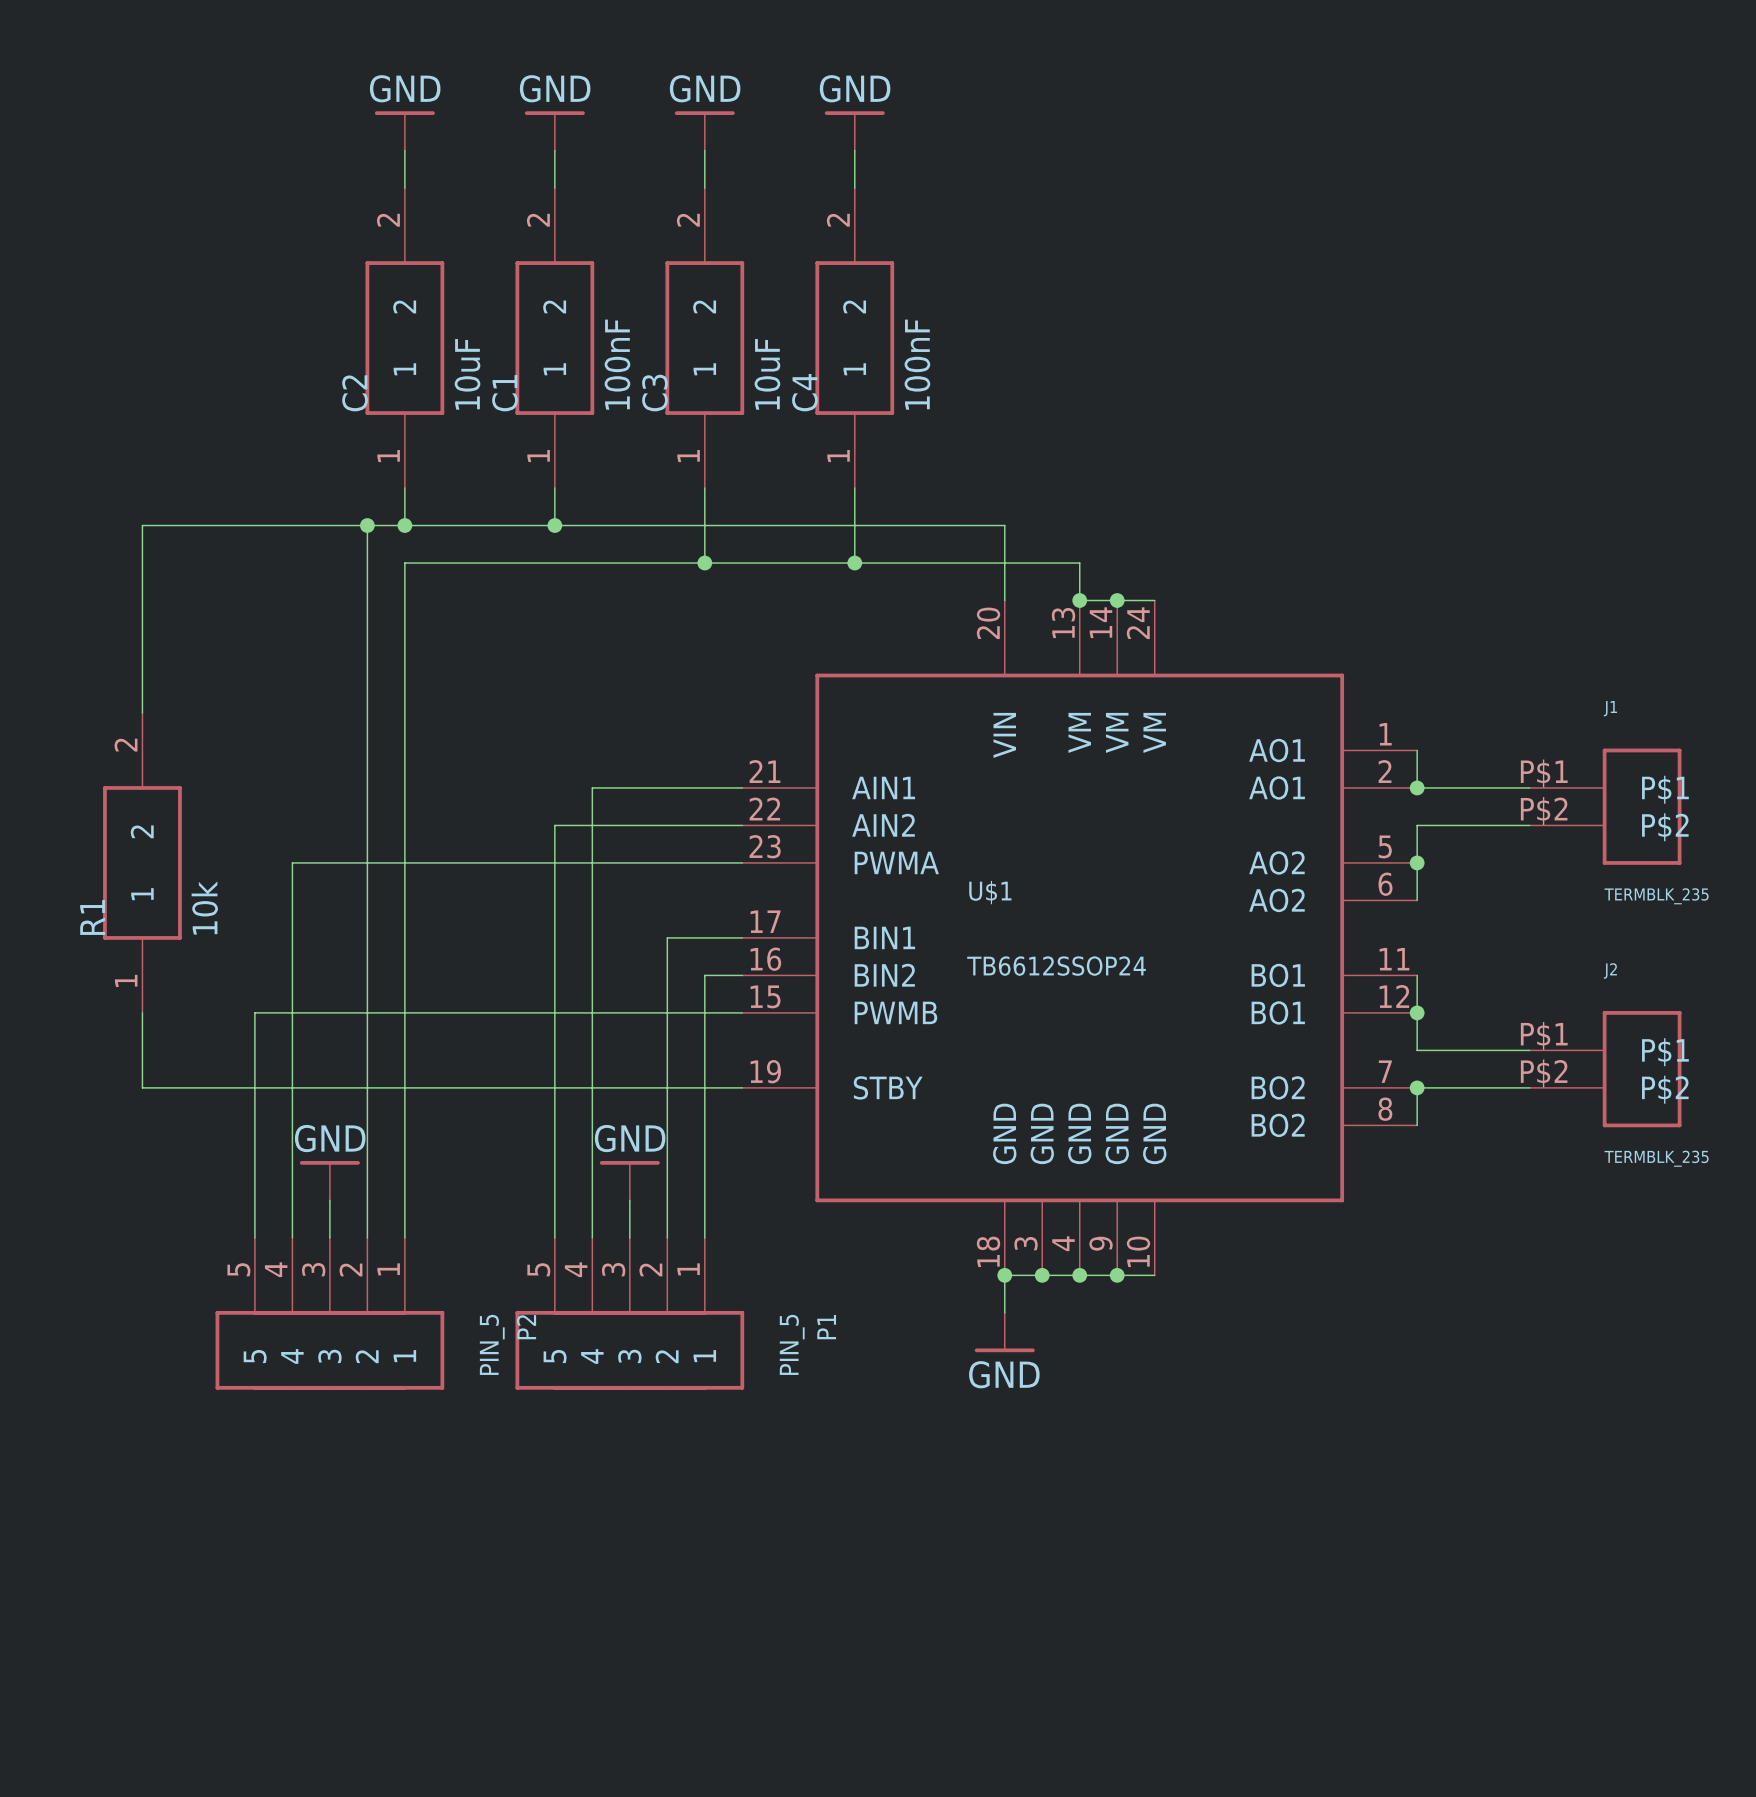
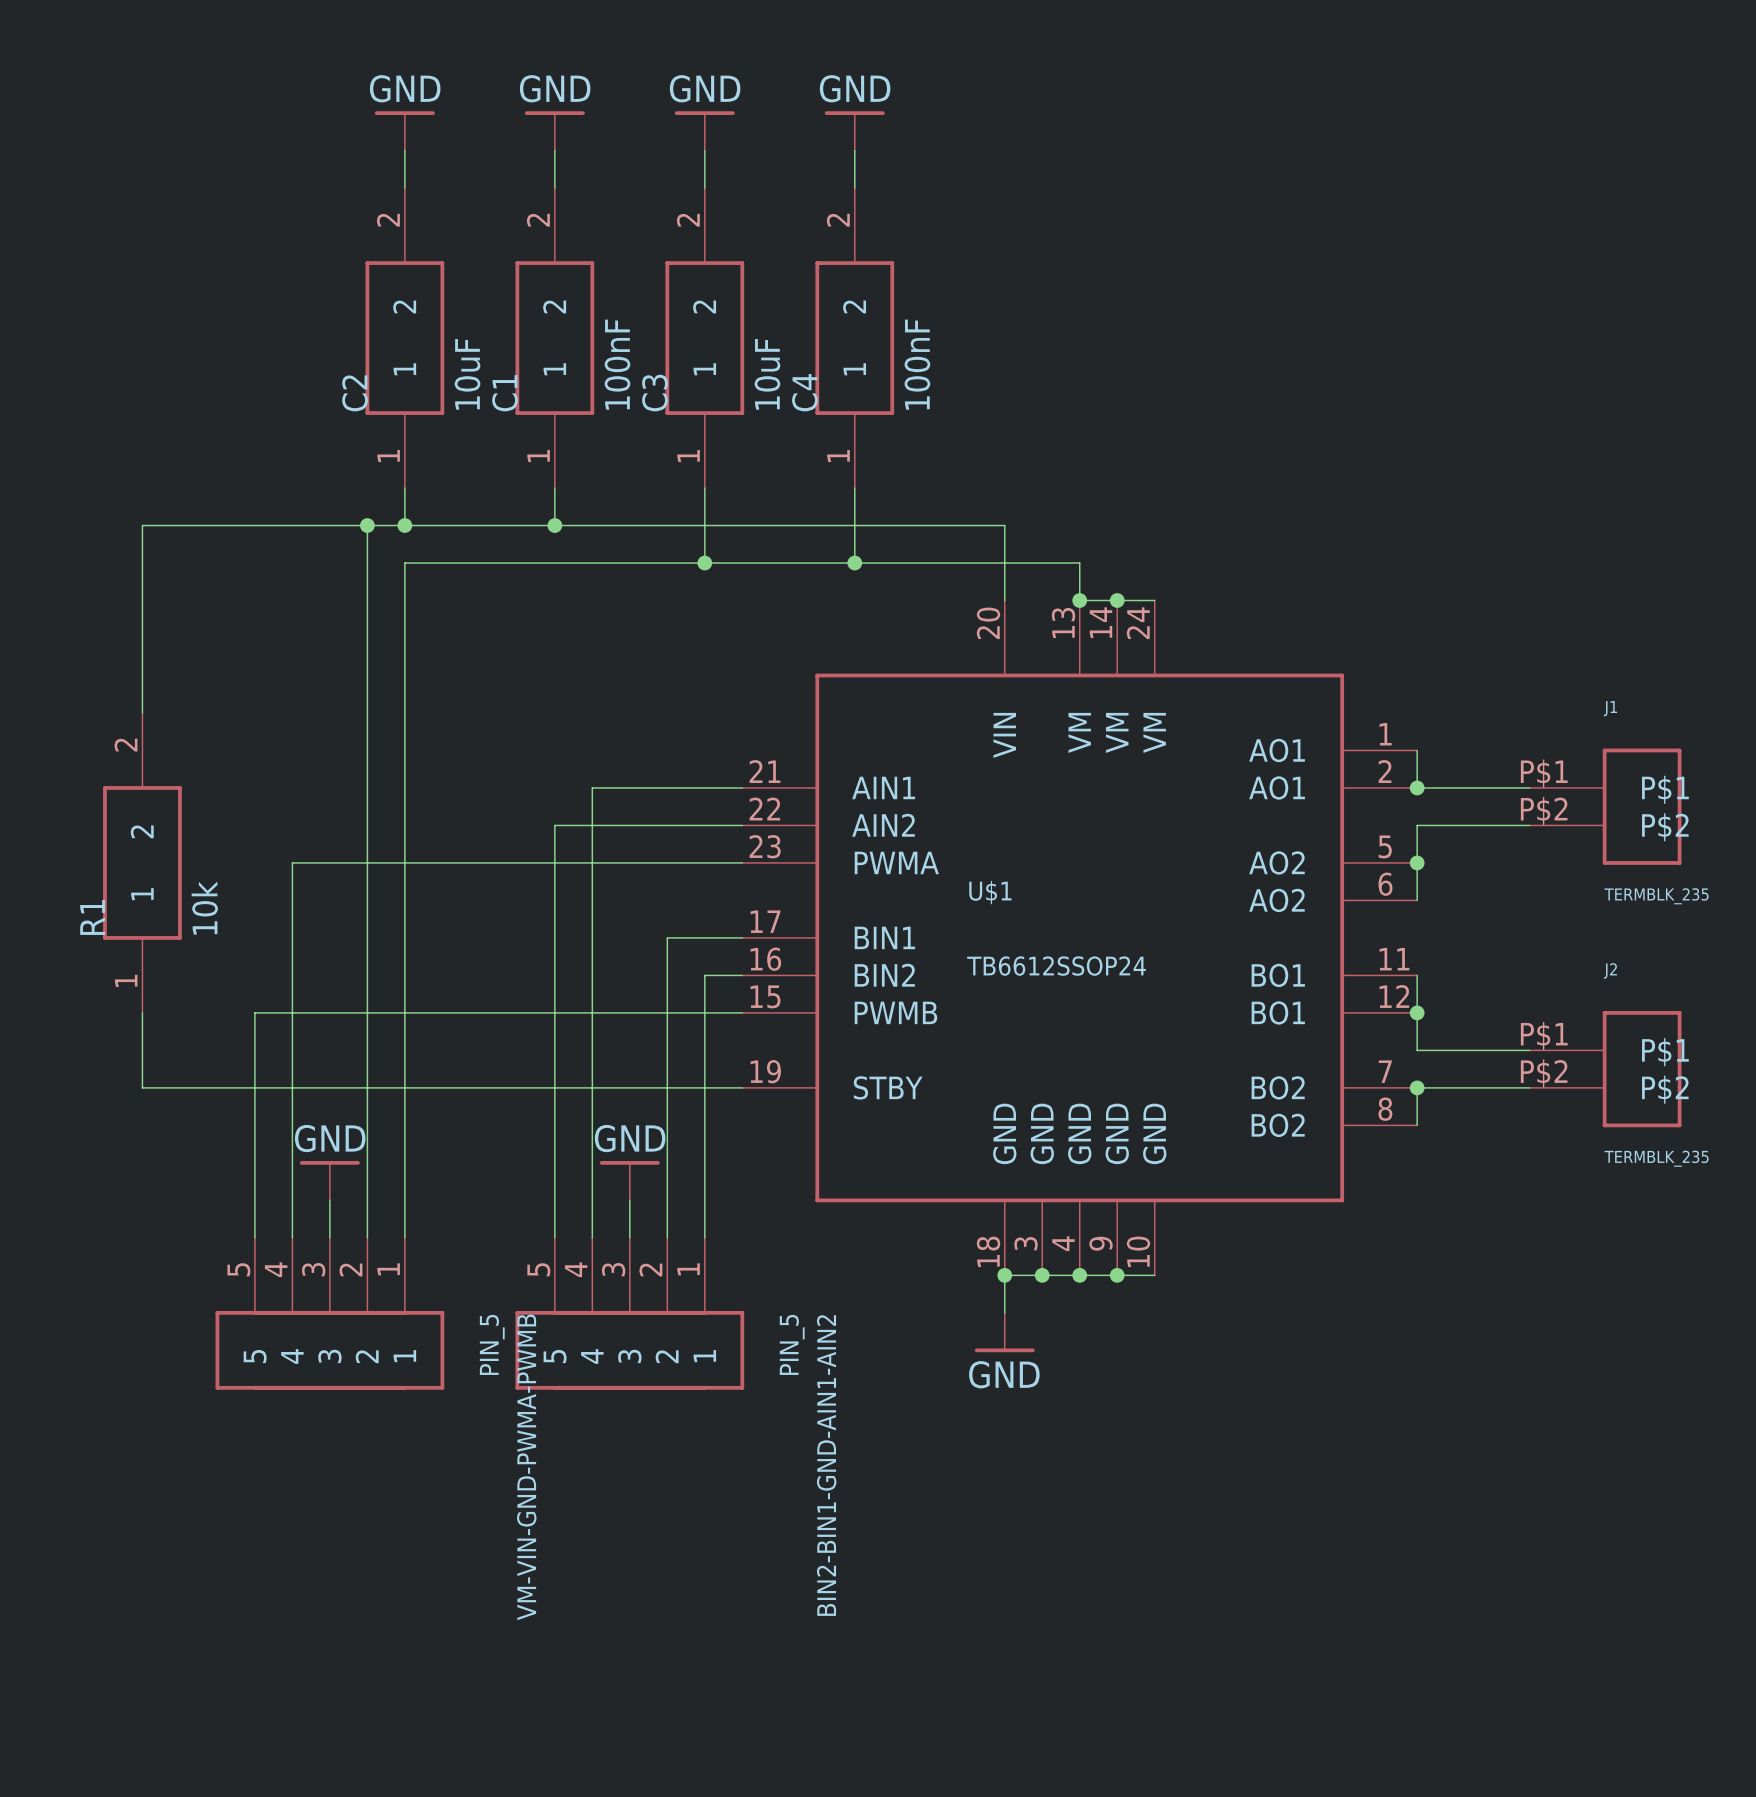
P2 name: P2 (526, 1327) -> VM-VIN-GND-PWMA-PWMB (526, 1467)
P1 name: P1 (826, 1327) -> BIN2-BIN1-GND-AIN1-AIN2 (826, 1465)

